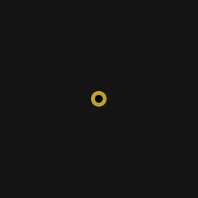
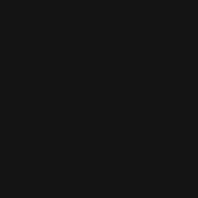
via: (98, 98) -> none

